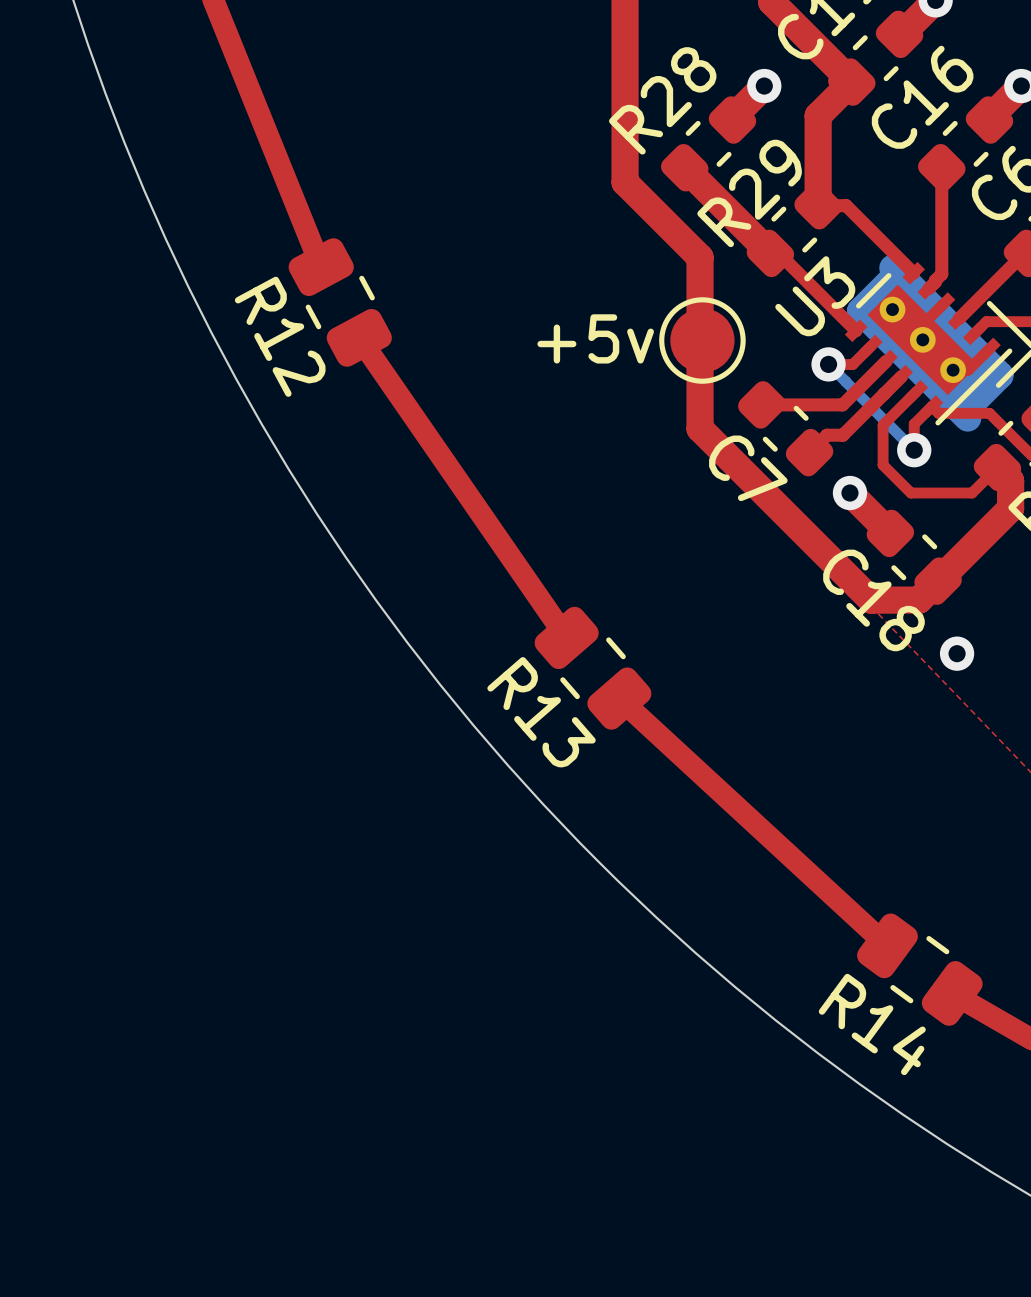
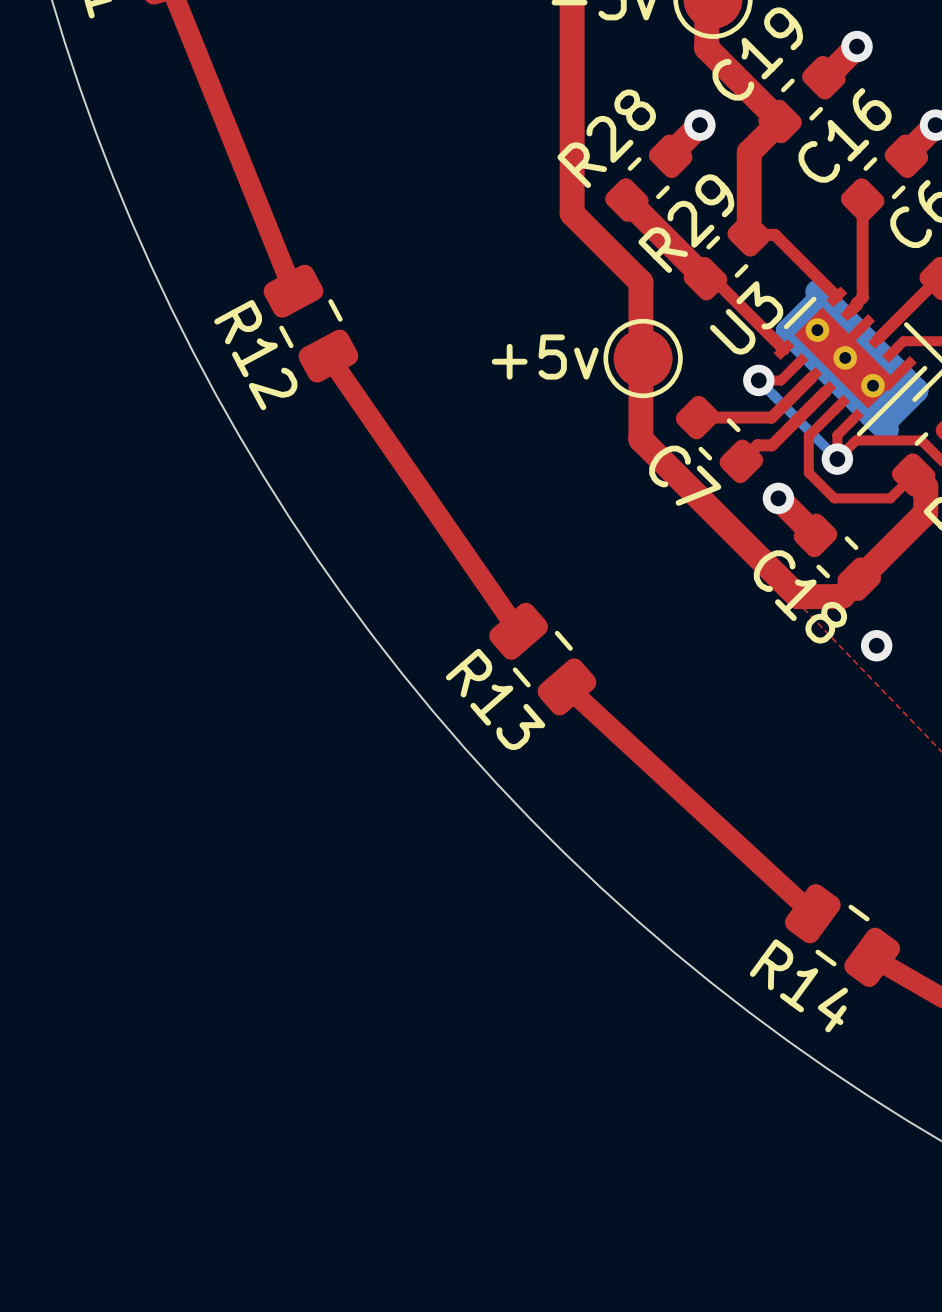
top track: (931, 406) (938, 413) (989, 413) (1006, 429) -> (837, 459) (856, 440) (921, 440)

